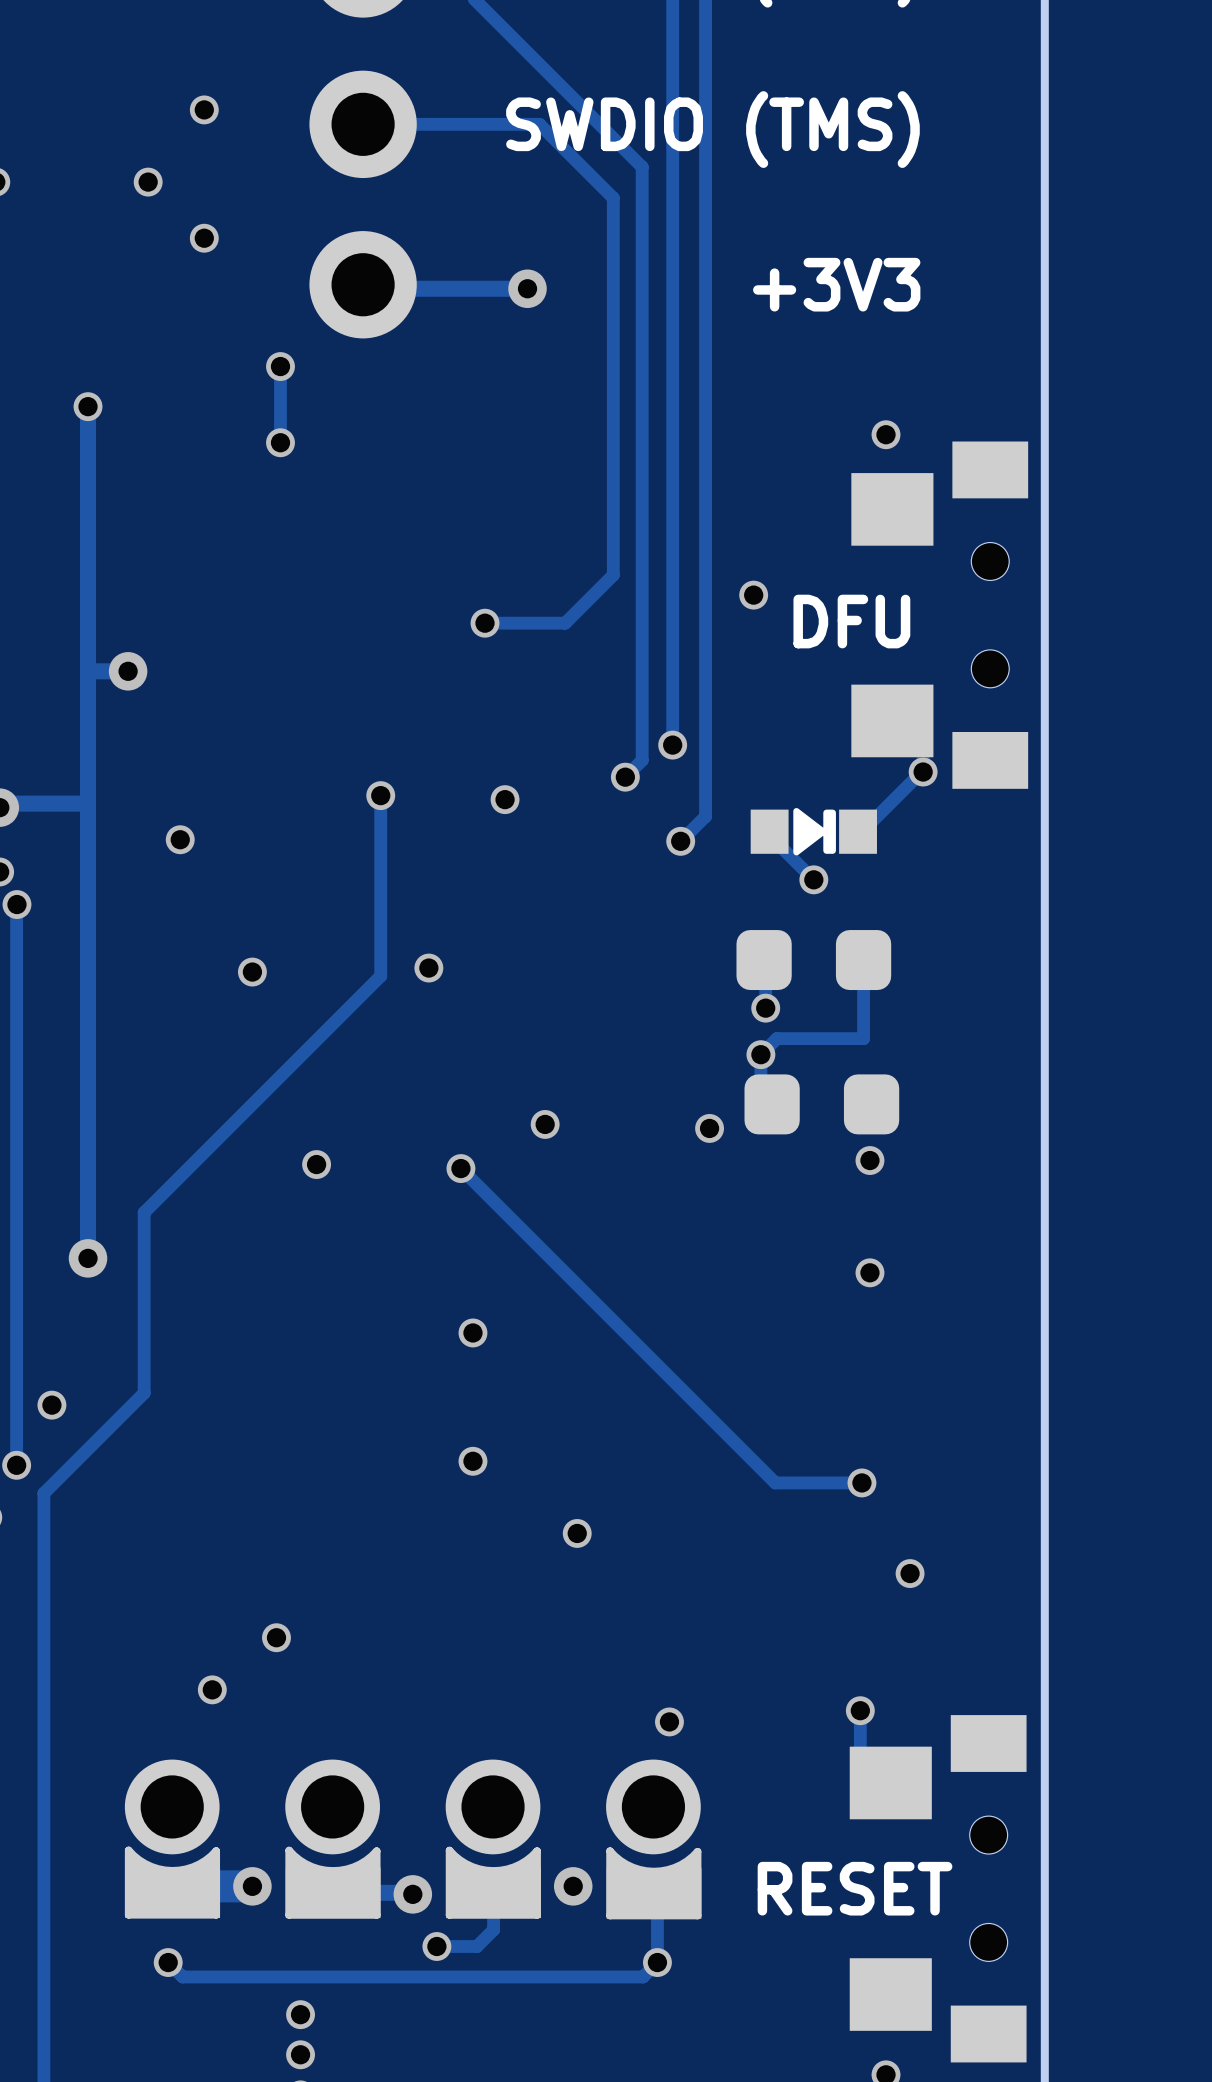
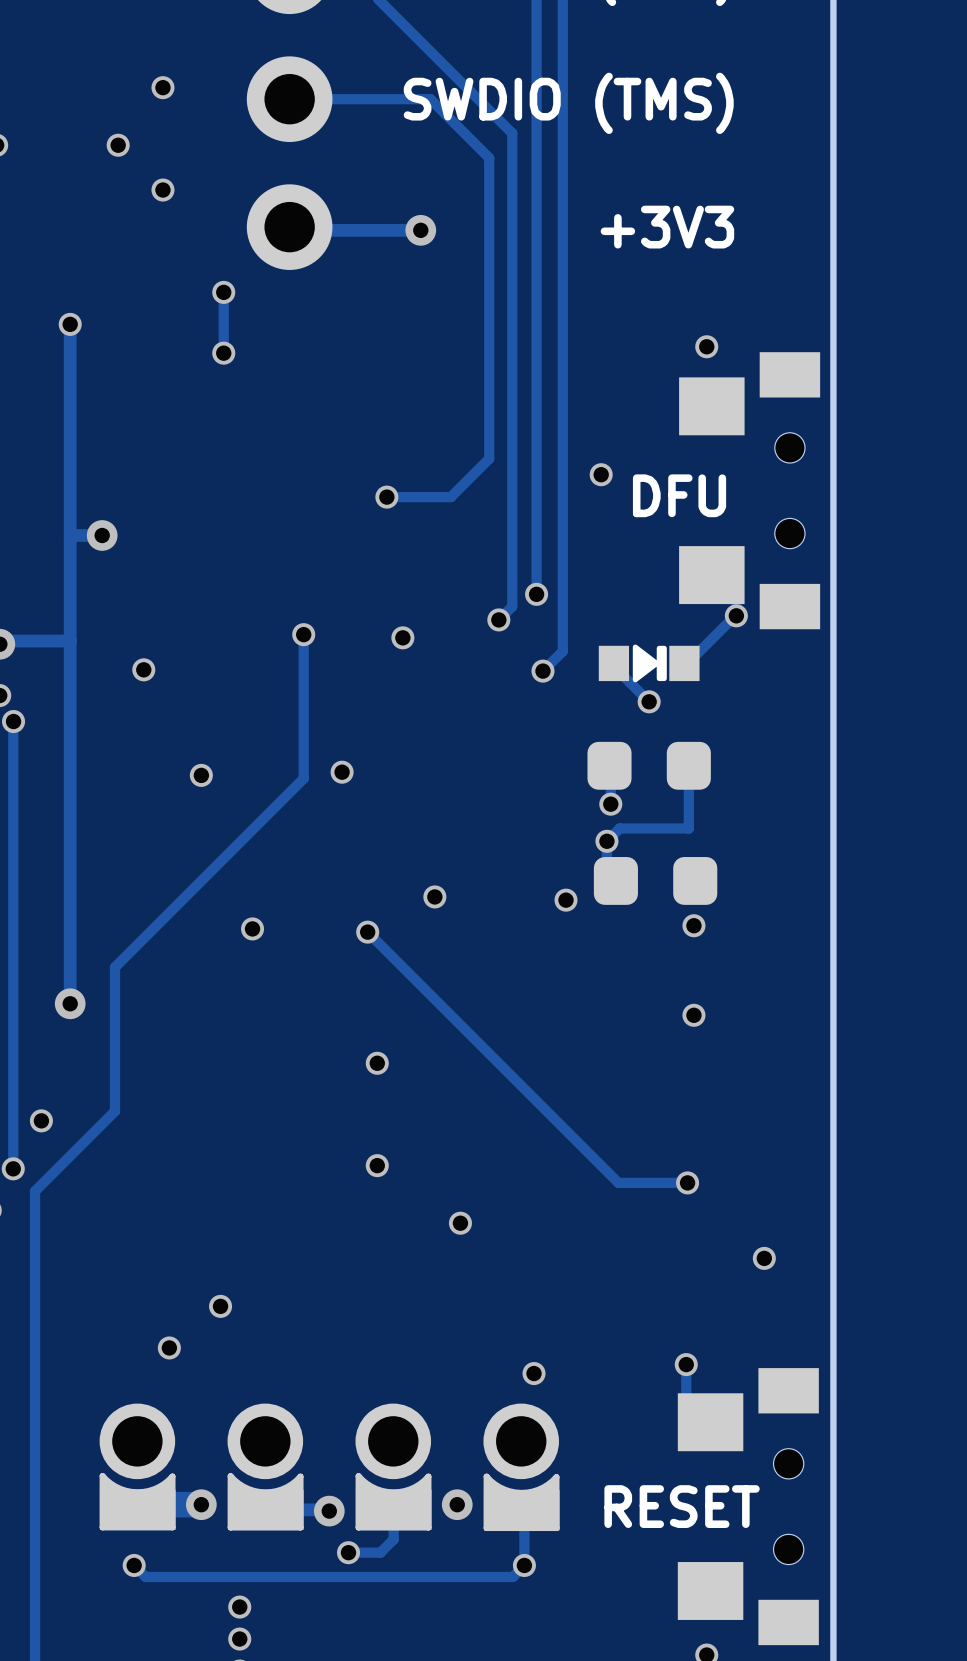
via position: (910, 1573) -> (764, 1258)

